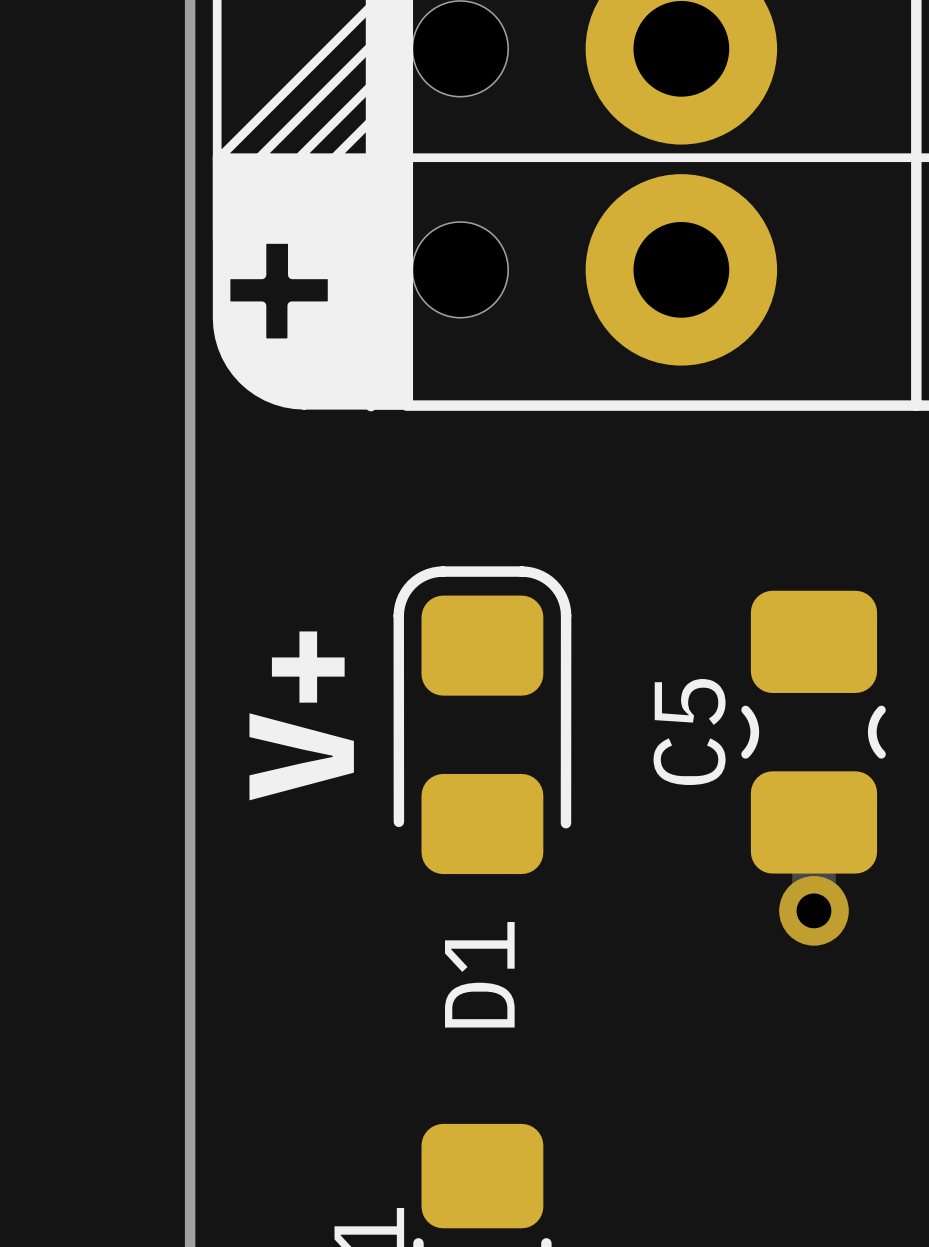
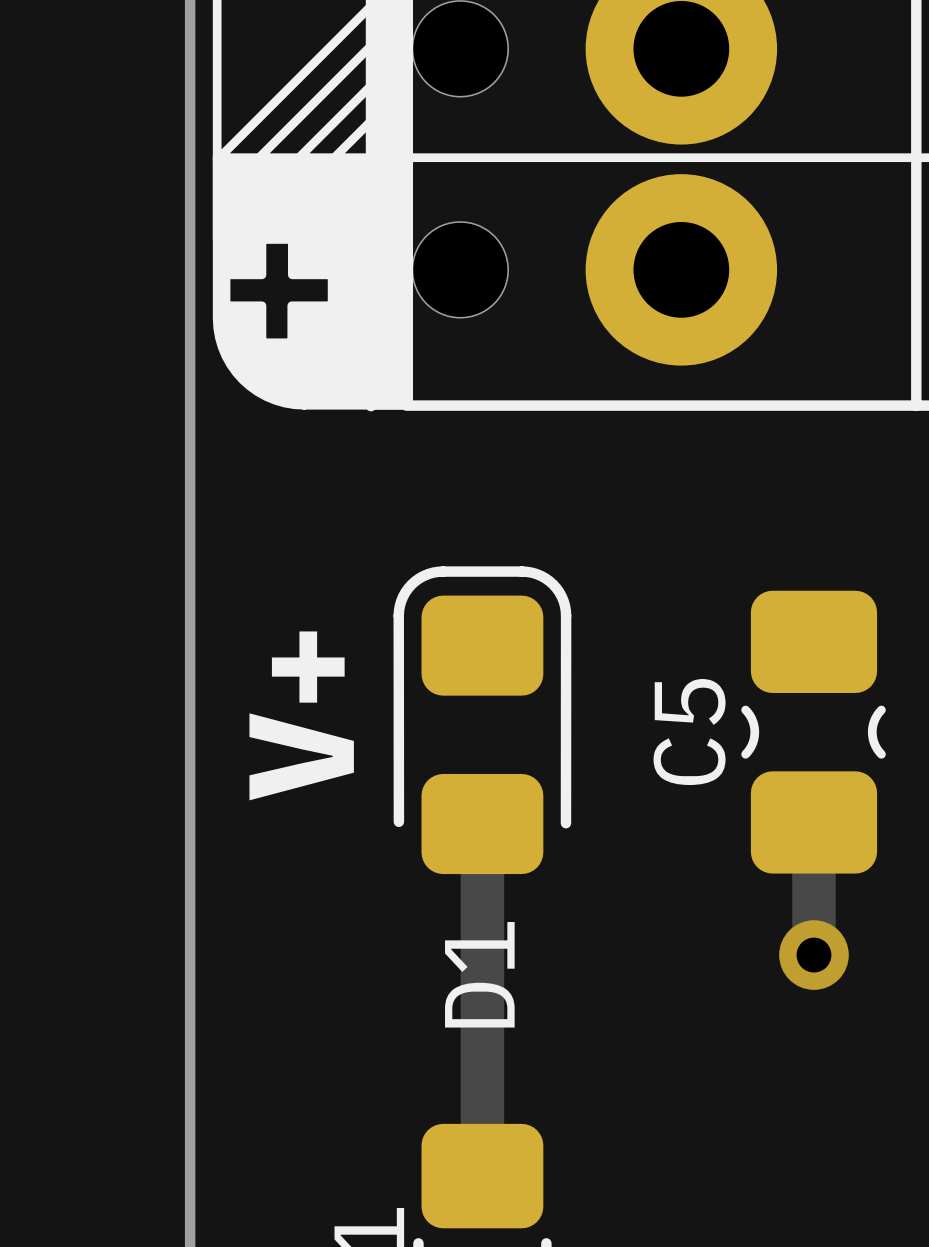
track: none -> (482, 824) (482, 1176)
via position: (813, 910) -> (813, 955)

